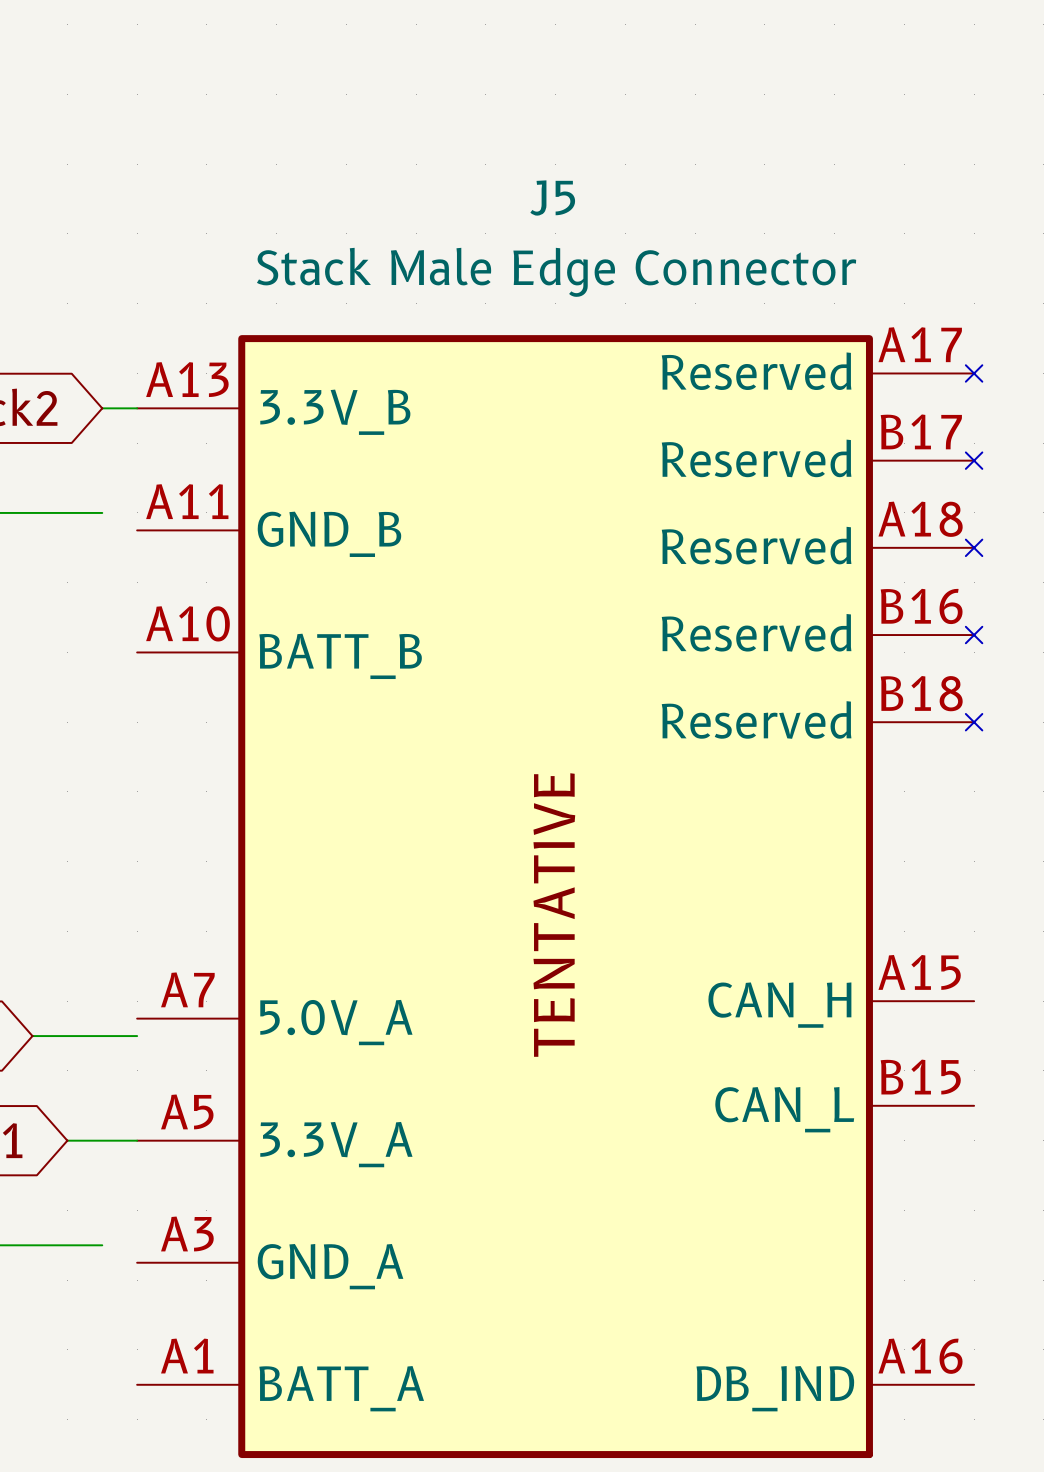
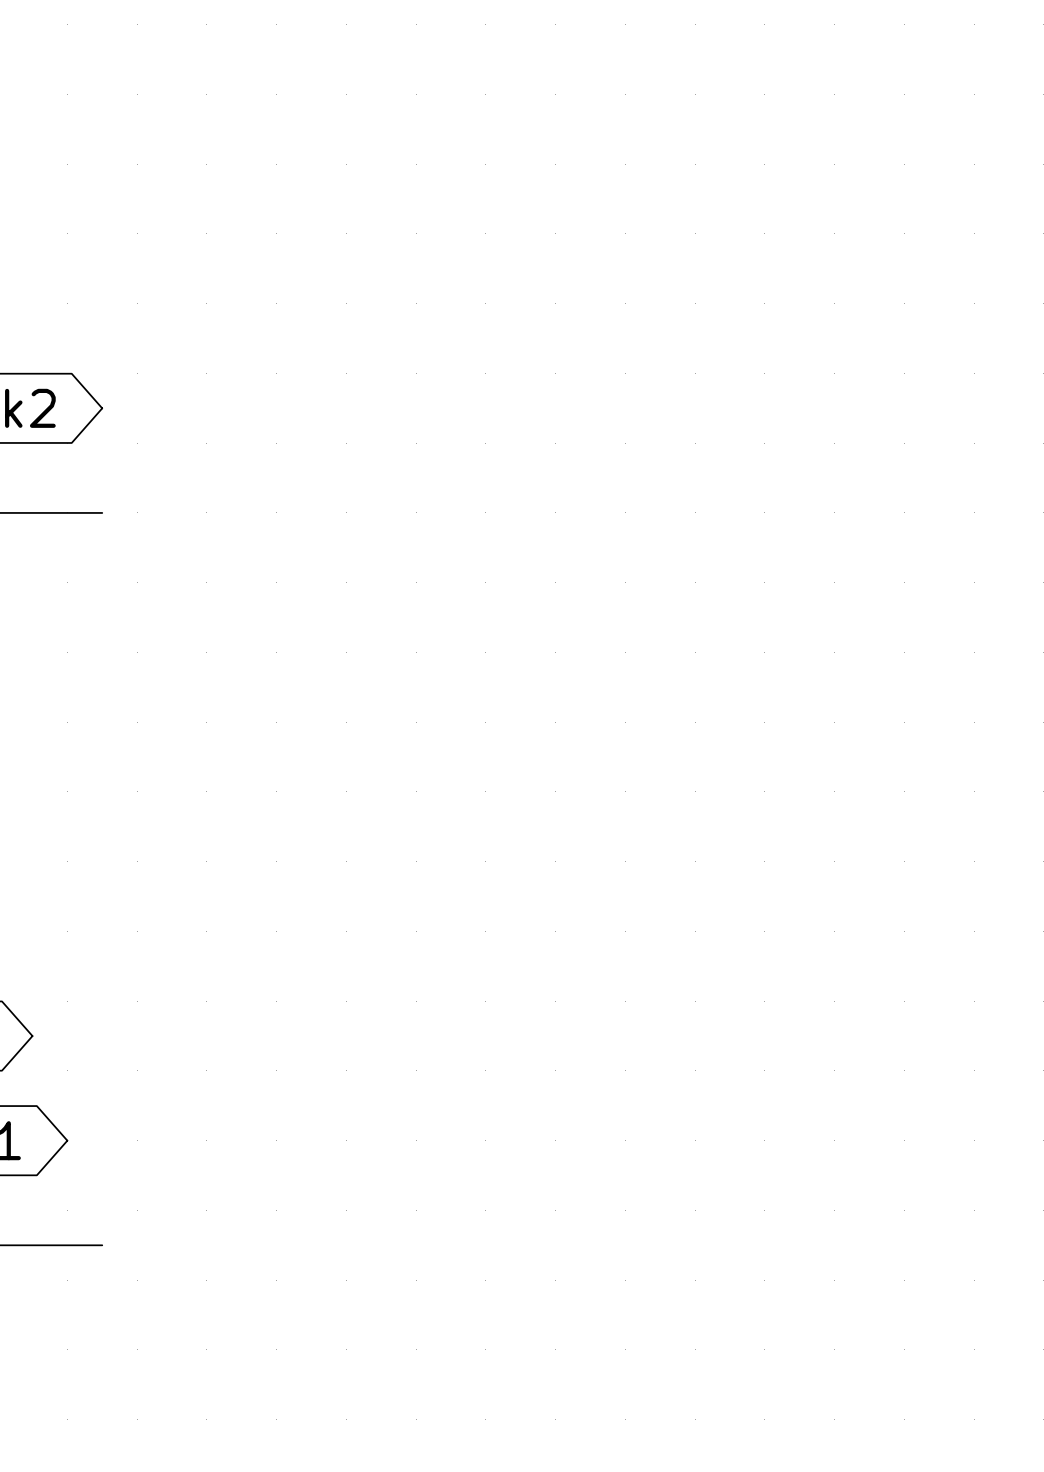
wire: (102, 408) (137, 408) -> none
J5: Stack Male Edge Connector (559, 896) -> none
wire: (32, 1036) (137, 1036) -> none
wire: (67, 1140) (137, 1140) -> none

